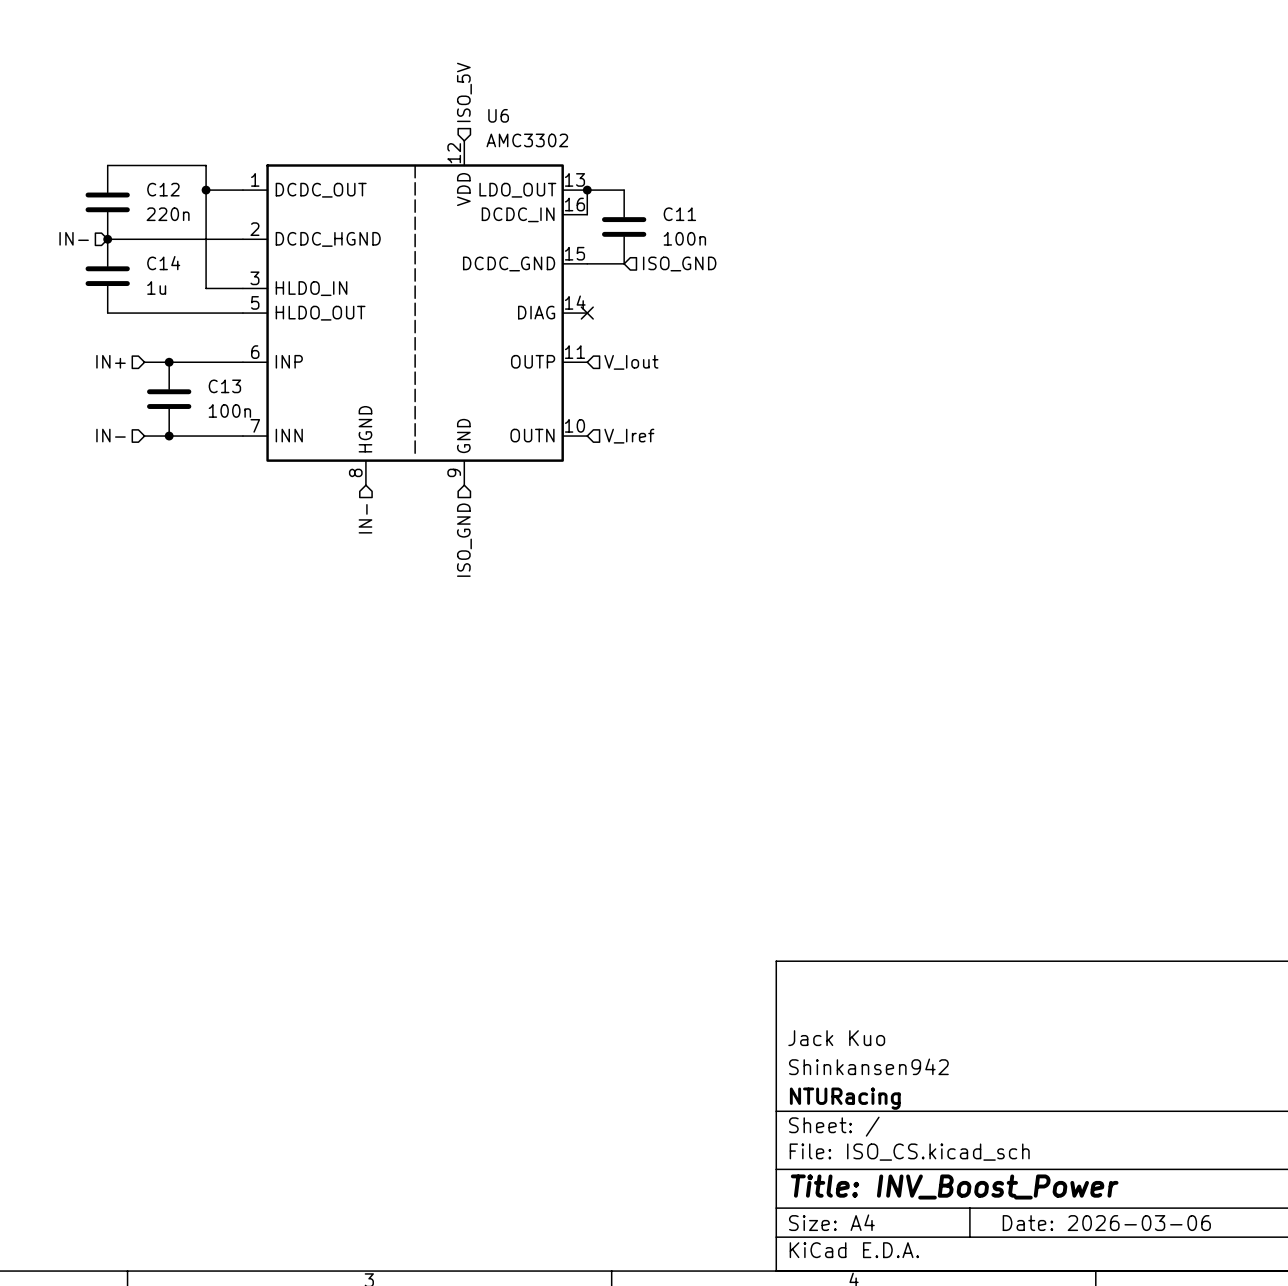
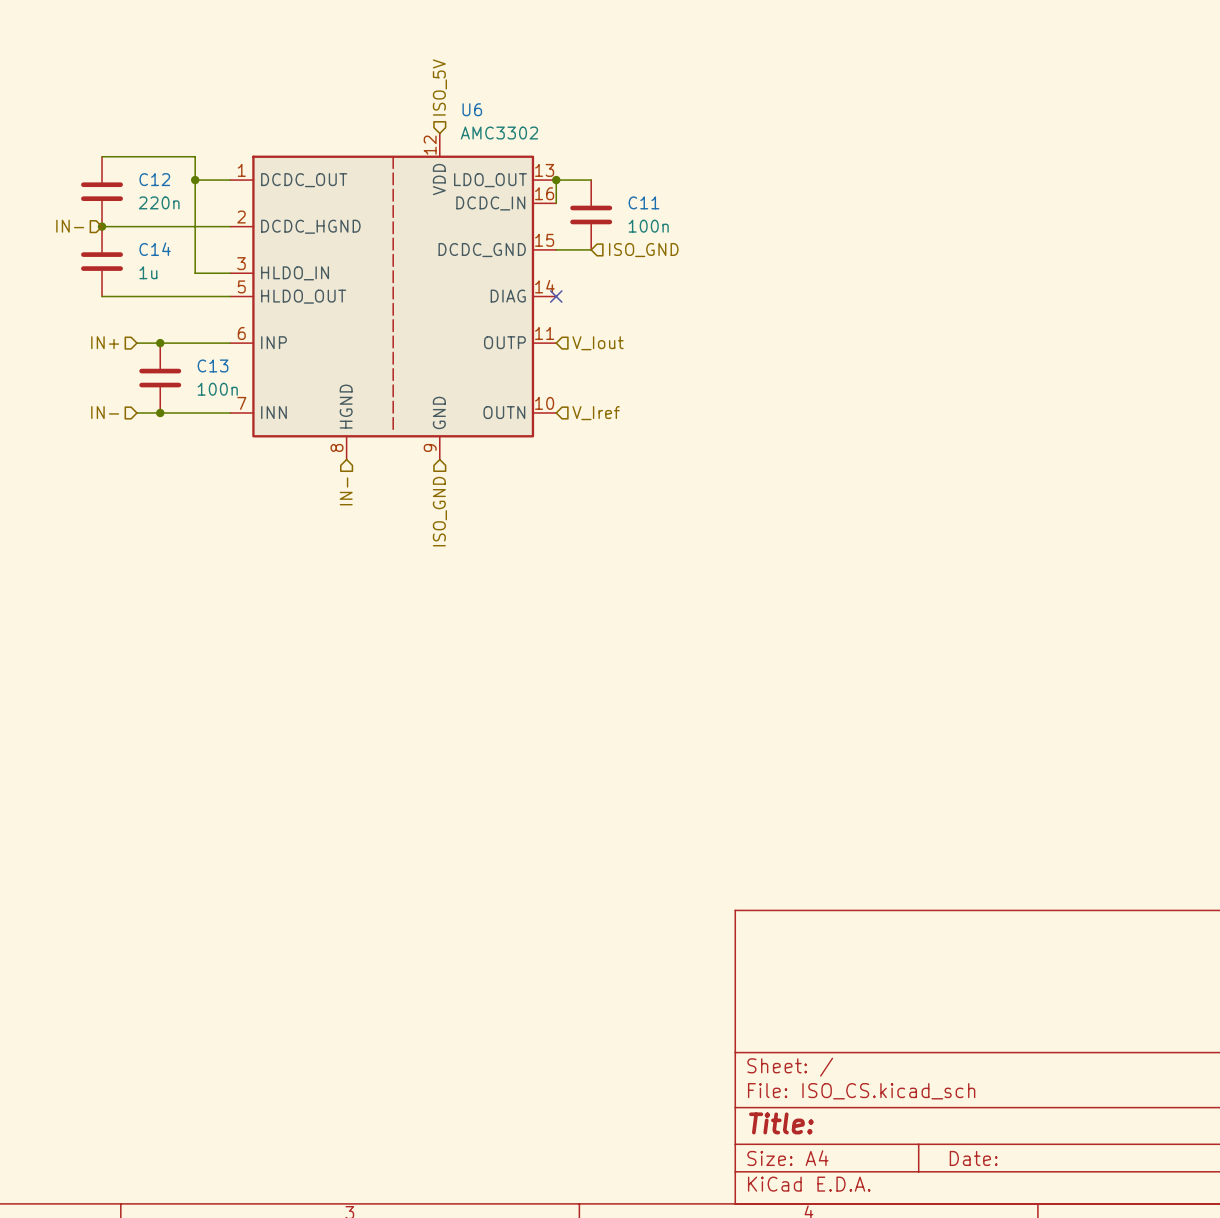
title block: Jack Kuo (836, 1038) -> none
title block: Shinkansen942 (868, 1066) -> none
title block: NTURacing (845, 1098) -> none
title block: Title: INV_Boost_Power (954, 1187) -> Title: (781, 1123)
title block: Date: 2026-03-06 (1106, 1223) -> Date: (973, 1158)

